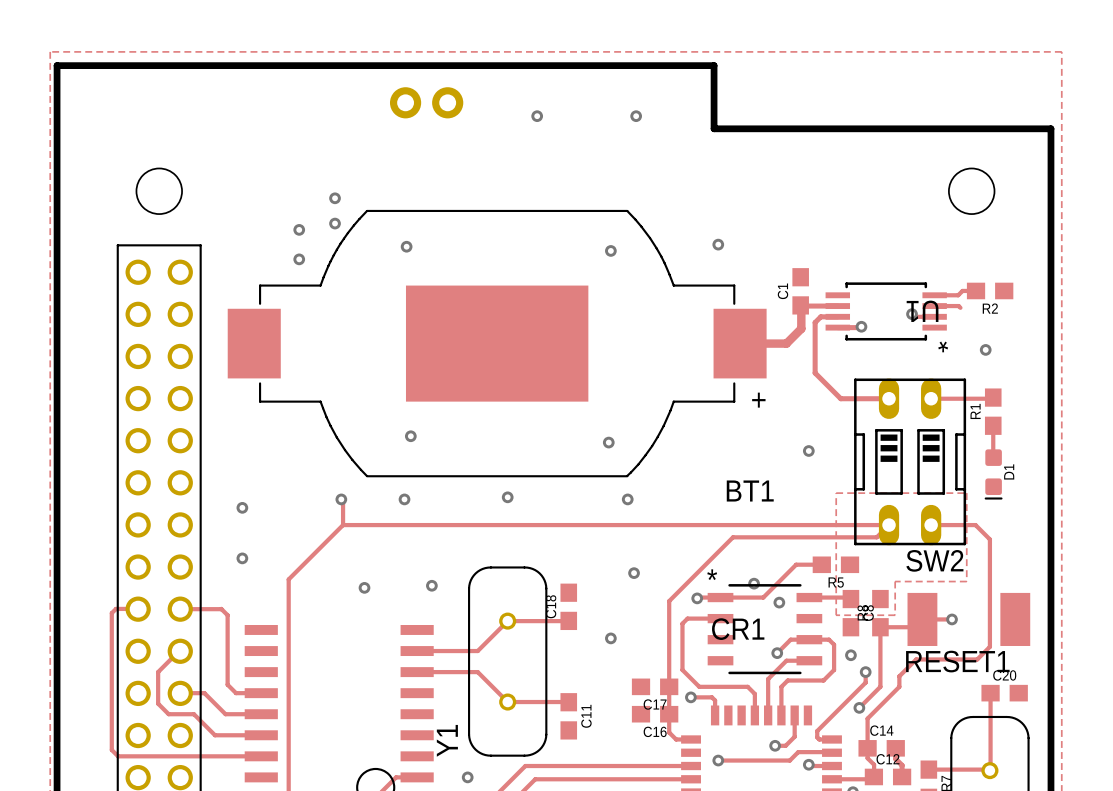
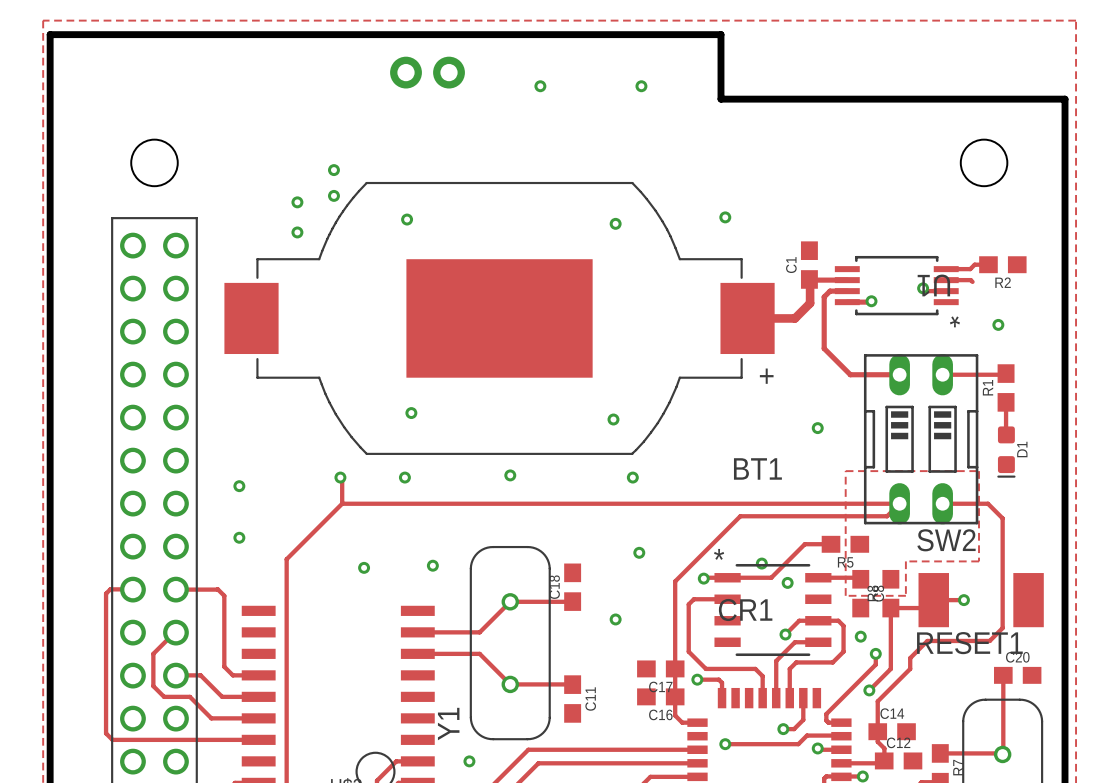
track: (895, 748) (895, 759) (902, 765) (902, 776) -> none

